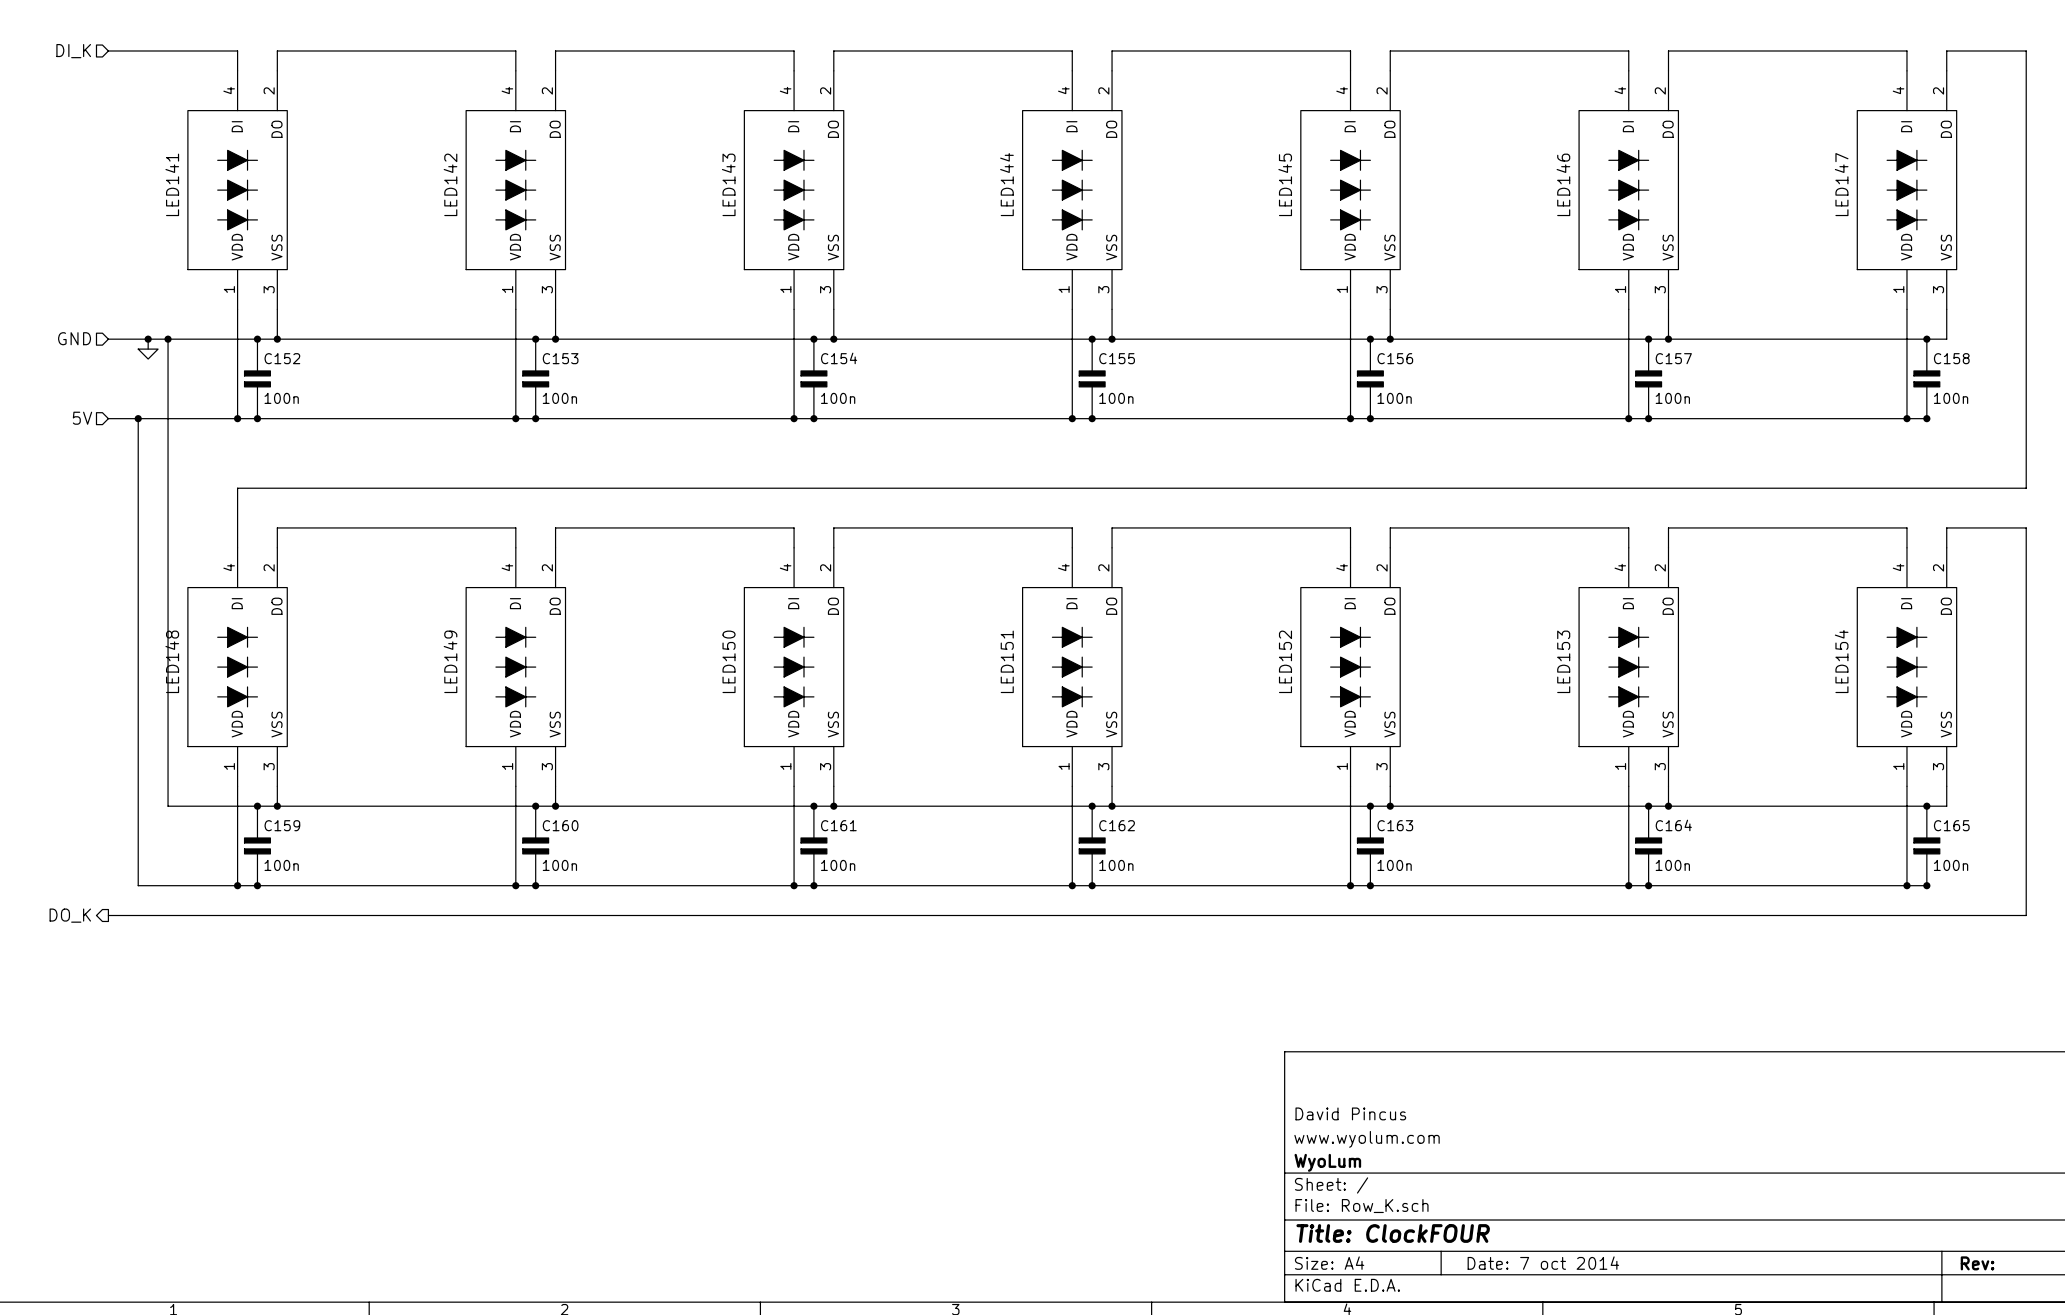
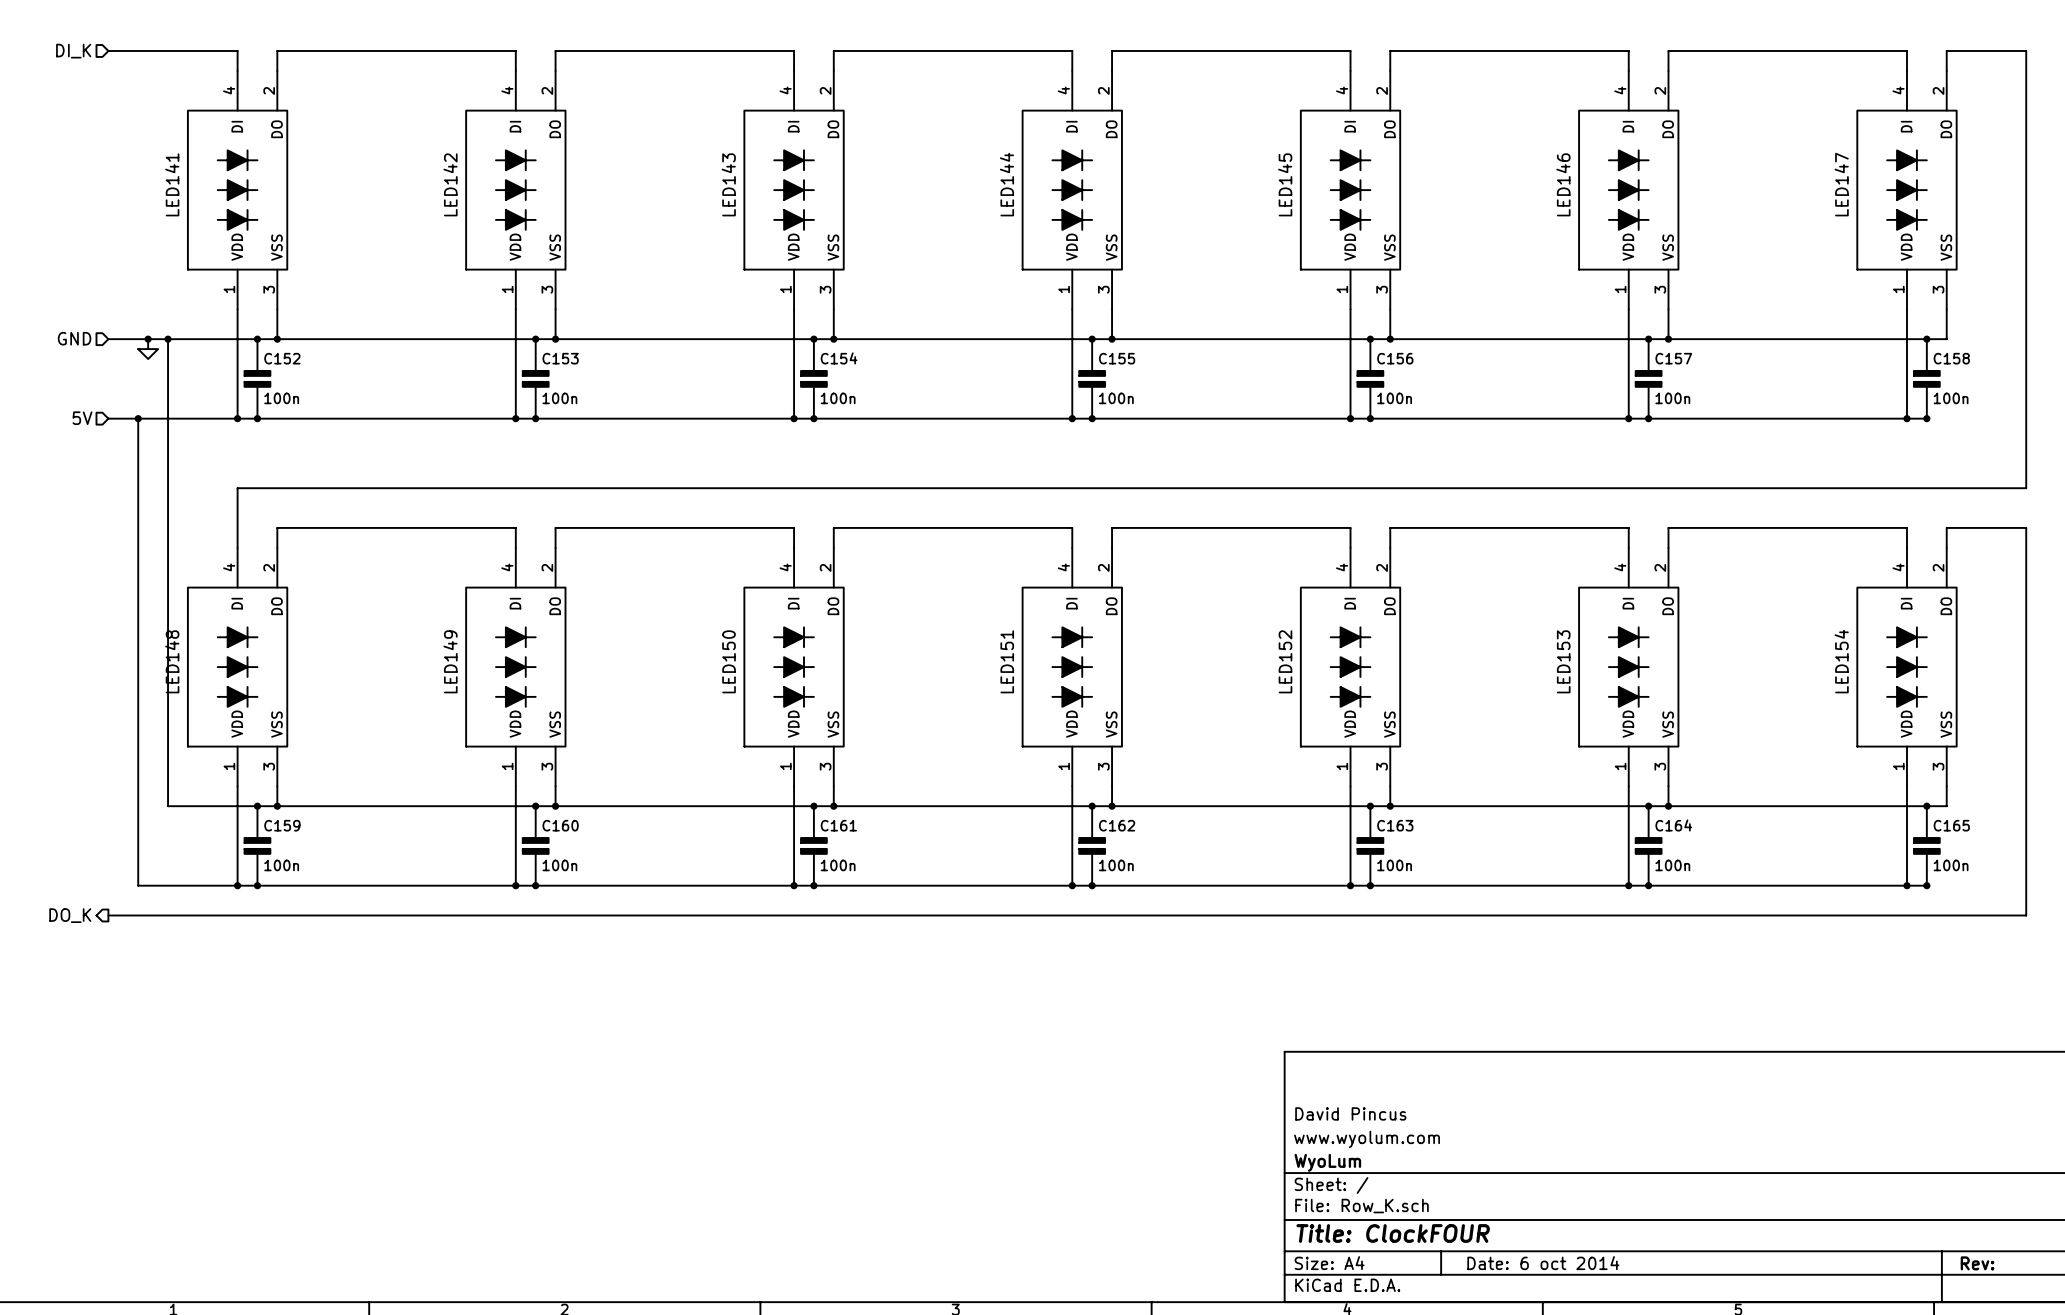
title block: Date: 7 oct 2014 (1543, 1263) -> Date: 6 oct 2014 (1543, 1263)

